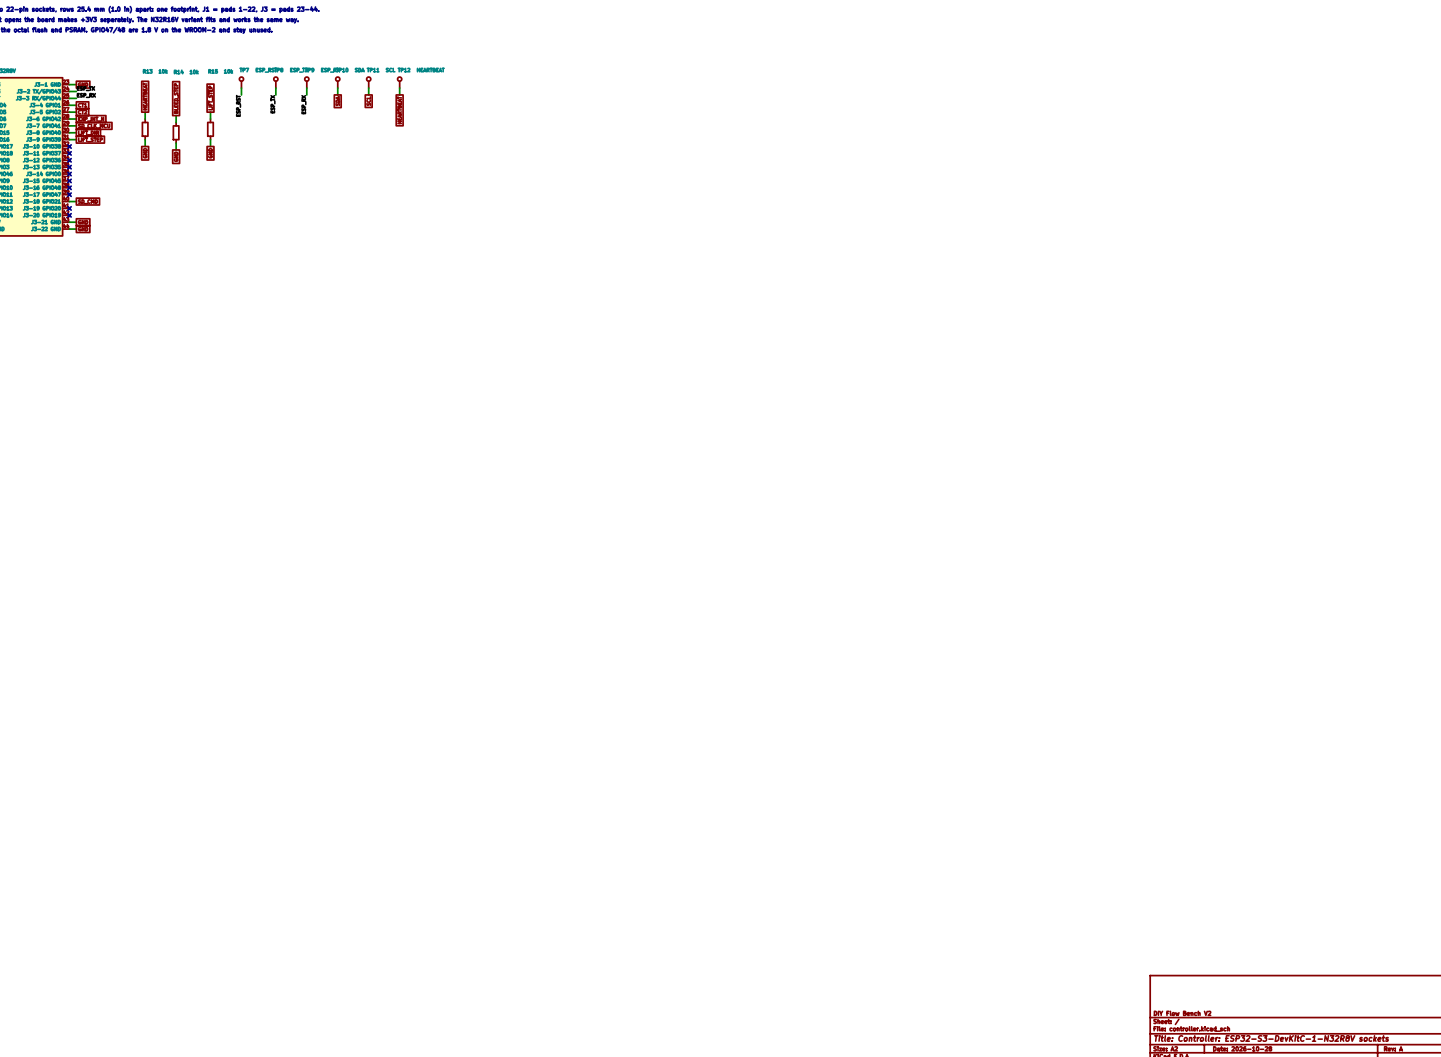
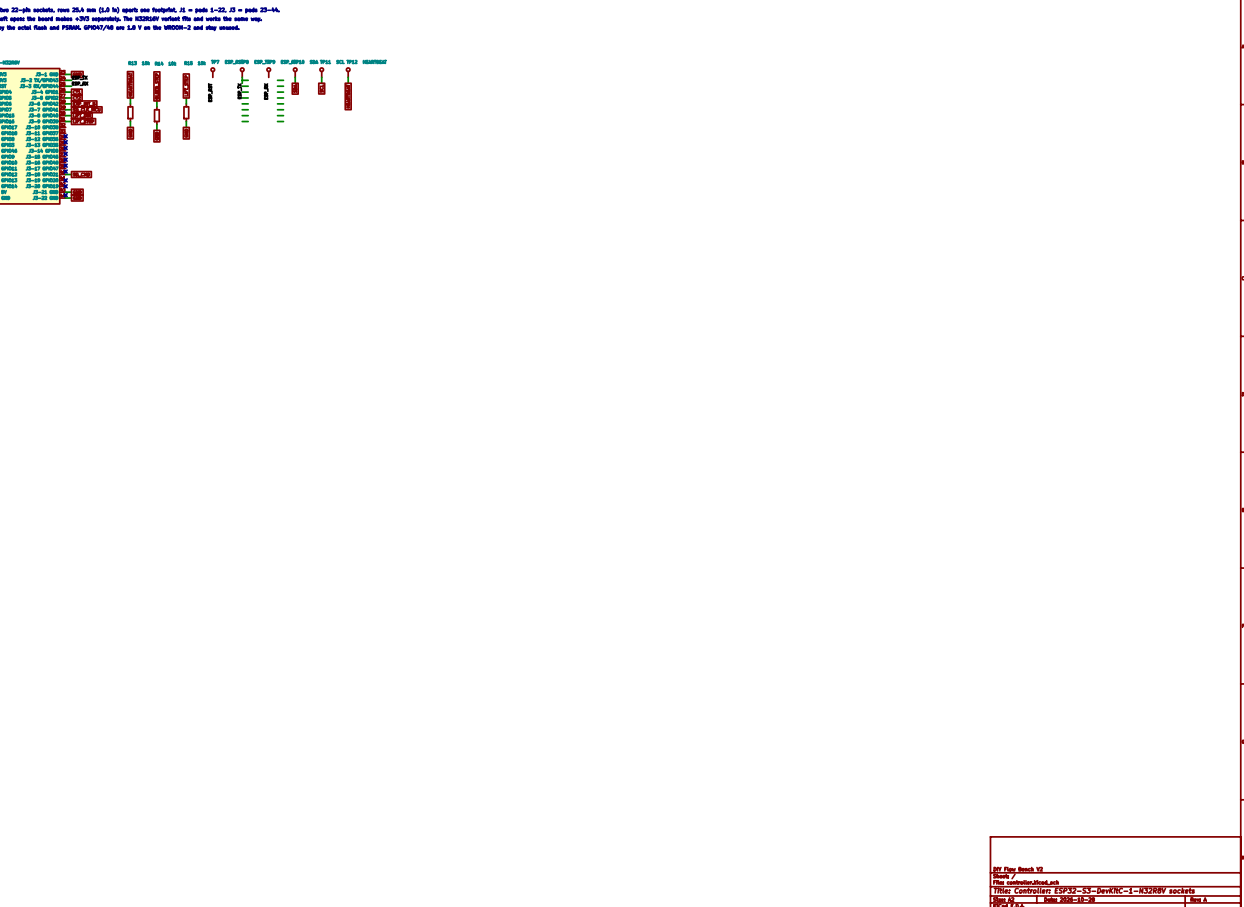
wire: (241, 88) (241, 94) -> none
wire: (306, 88) (306, 94) -> none
wire: none -> (242, 80) (248, 80)
wire: none -> (277, 80) (283, 80)
wire: none -> (242, 86) (248, 86)
wire: none -> (277, 86) (283, 86)
wire: none -> (242, 92) (248, 92)
wire: none -> (277, 92) (283, 92)
wire: none -> (242, 97) (248, 97)
wire: none -> (277, 97) (283, 97)
wire: none -> (242, 103) (248, 103)
wire: none -> (277, 103) (283, 103)
wire: none -> (242, 109) (248, 109)
wire: none -> (277, 109) (283, 109)
wire: none -> (242, 115) (248, 115)
wire: none -> (277, 115) (283, 115)
wire: none -> (242, 121) (248, 121)
wire: none -> (277, 121) (283, 121)
no-connect mark: (69, 146) -> none
no-connect mark: (69, 153) -> none
no-connect mark: none -> (65, 136)
no-connect mark: (69, 160) -> none
no-connect mark: none -> (65, 142)
no-connect mark: (69, 167) -> none
no-connect mark: none -> (65, 148)
no-connect mark: (69, 174) -> none
no-connect mark: none -> (65, 153)
no-connect mark: (69, 180) -> none
no-connect mark: none -> (65, 159)
no-connect mark: (69, 187) -> none
no-connect mark: none -> (65, 165)
no-connect mark: (69, 194) -> none
no-connect mark: none -> (65, 171)
no-connect mark: none -> (65, 195)

